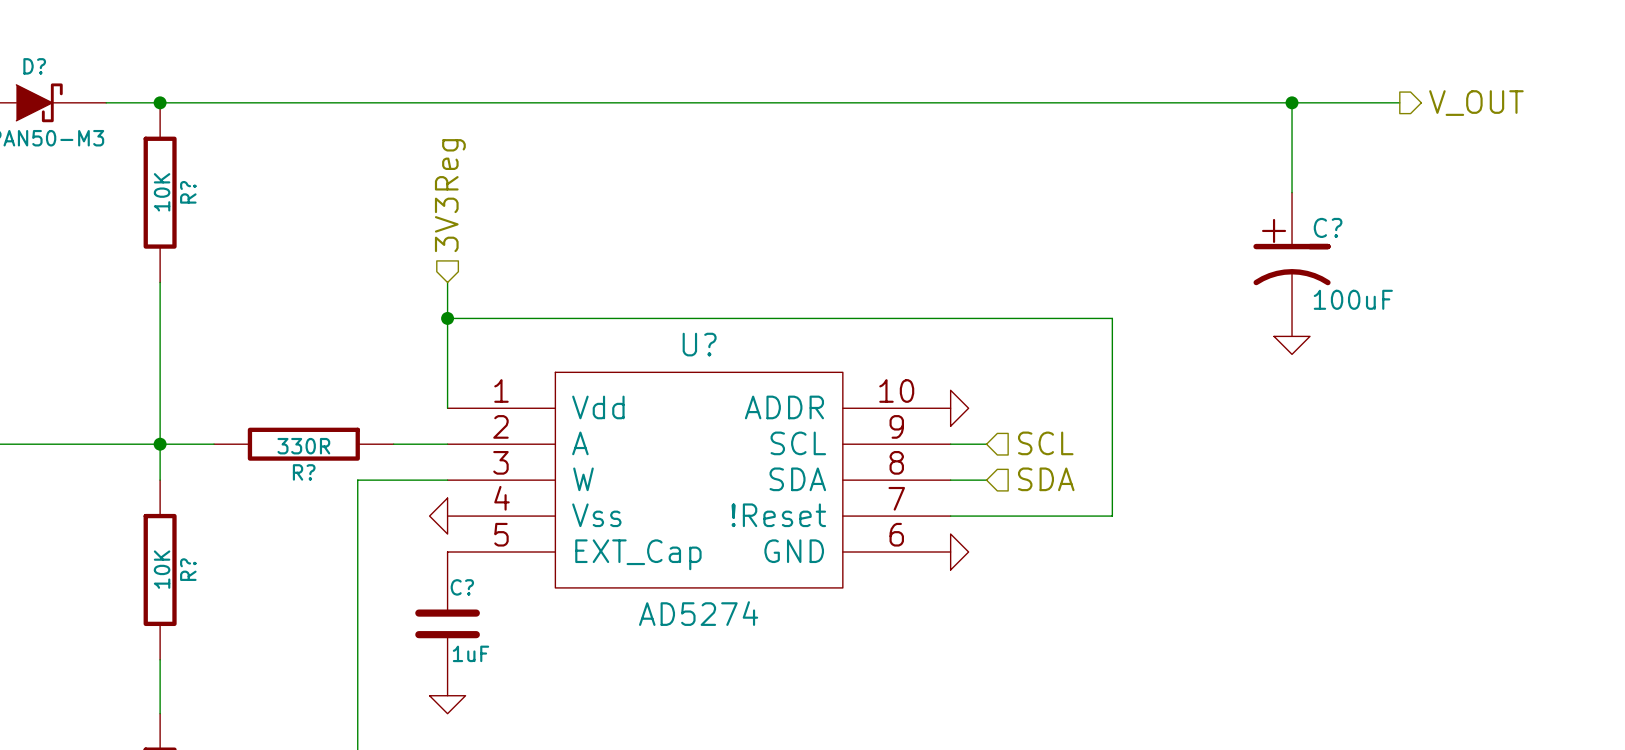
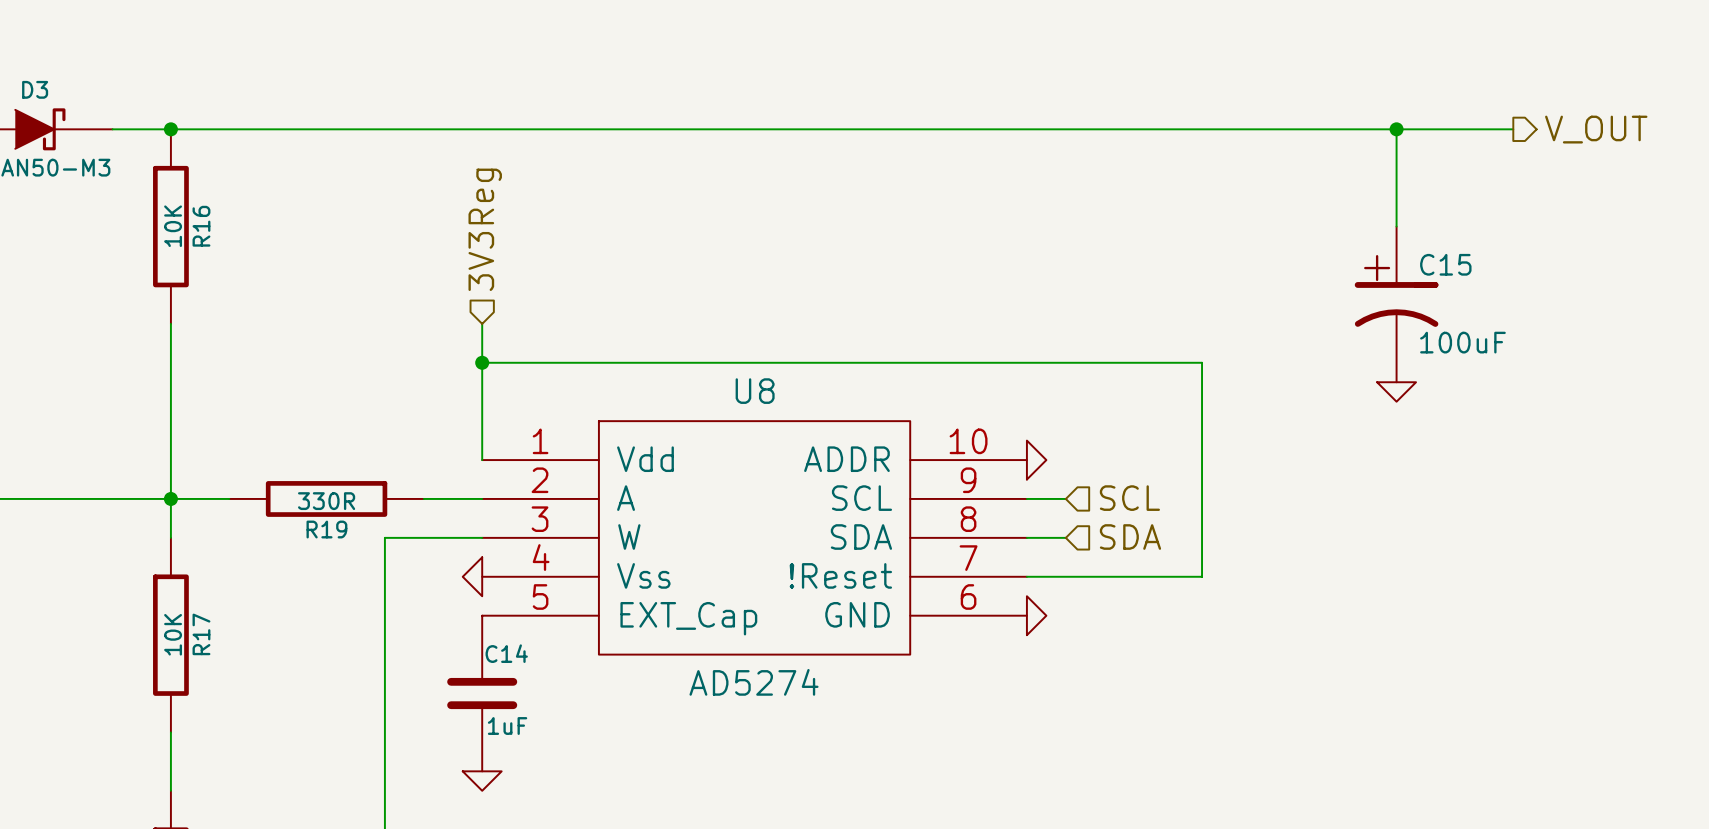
D? name: D? (34, 66) -> D3 (35, 89)
R? name: R? (188, 192) -> R16 (201, 226)
C? name: C? (1328, 227) -> C15 (1445, 264)
U? name: U? (699, 344) -> U8 (755, 391)
R? name: R? (304, 472) -> R19 (326, 529)
R? name: R? (188, 569) -> R17 (201, 634)
C? name: C? (462, 587) -> C14 (506, 653)

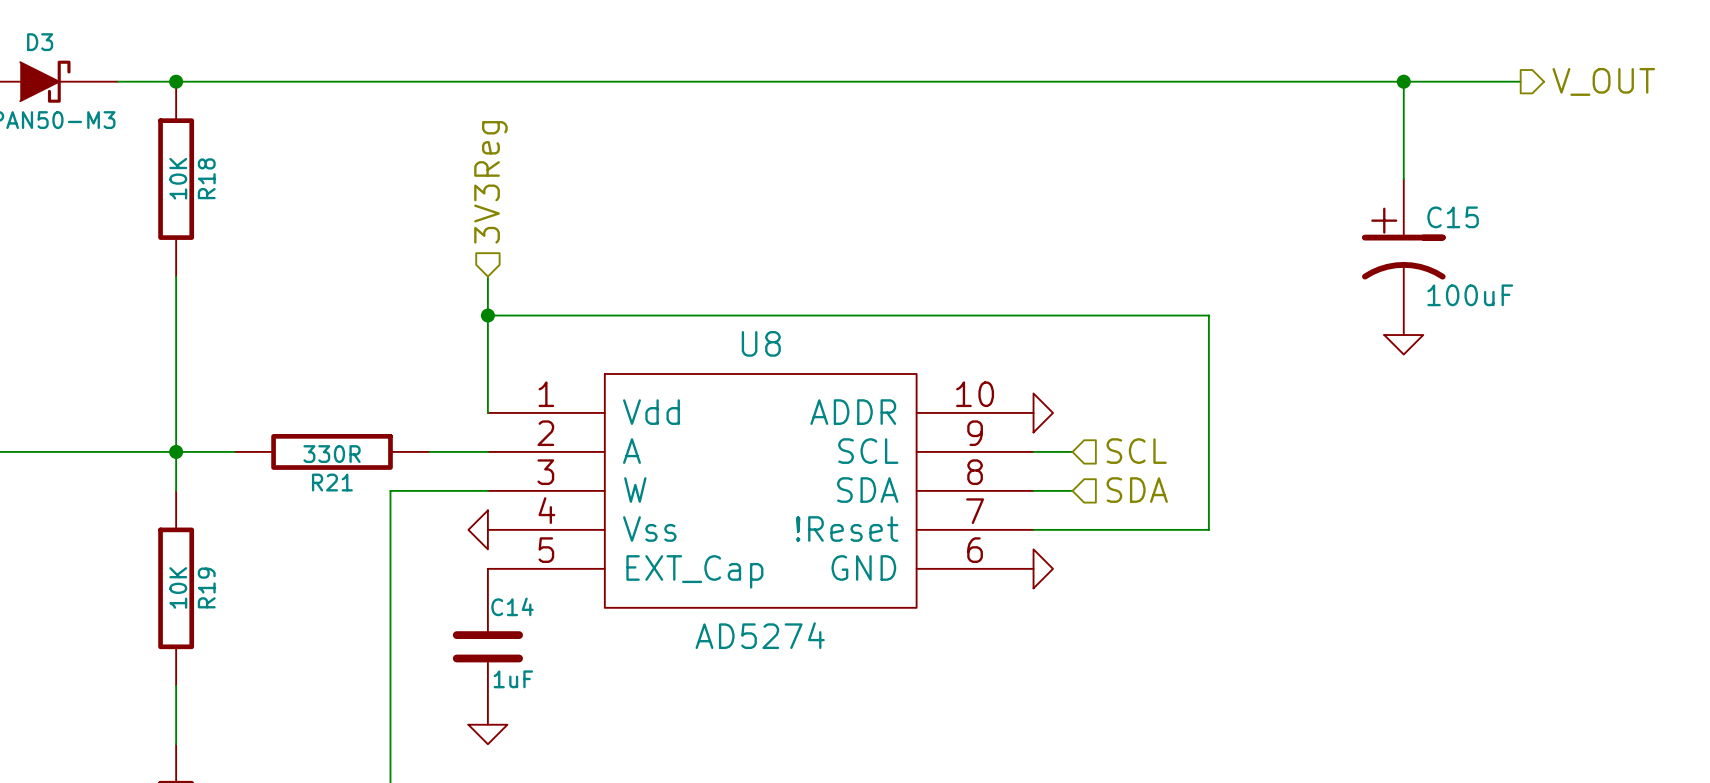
R16 name: R16 (201, 226) -> R18 (206, 178)
R19 name: R19 (326, 529) -> R21 (332, 482)
R17 name: R17 (201, 634) -> R19 (206, 587)

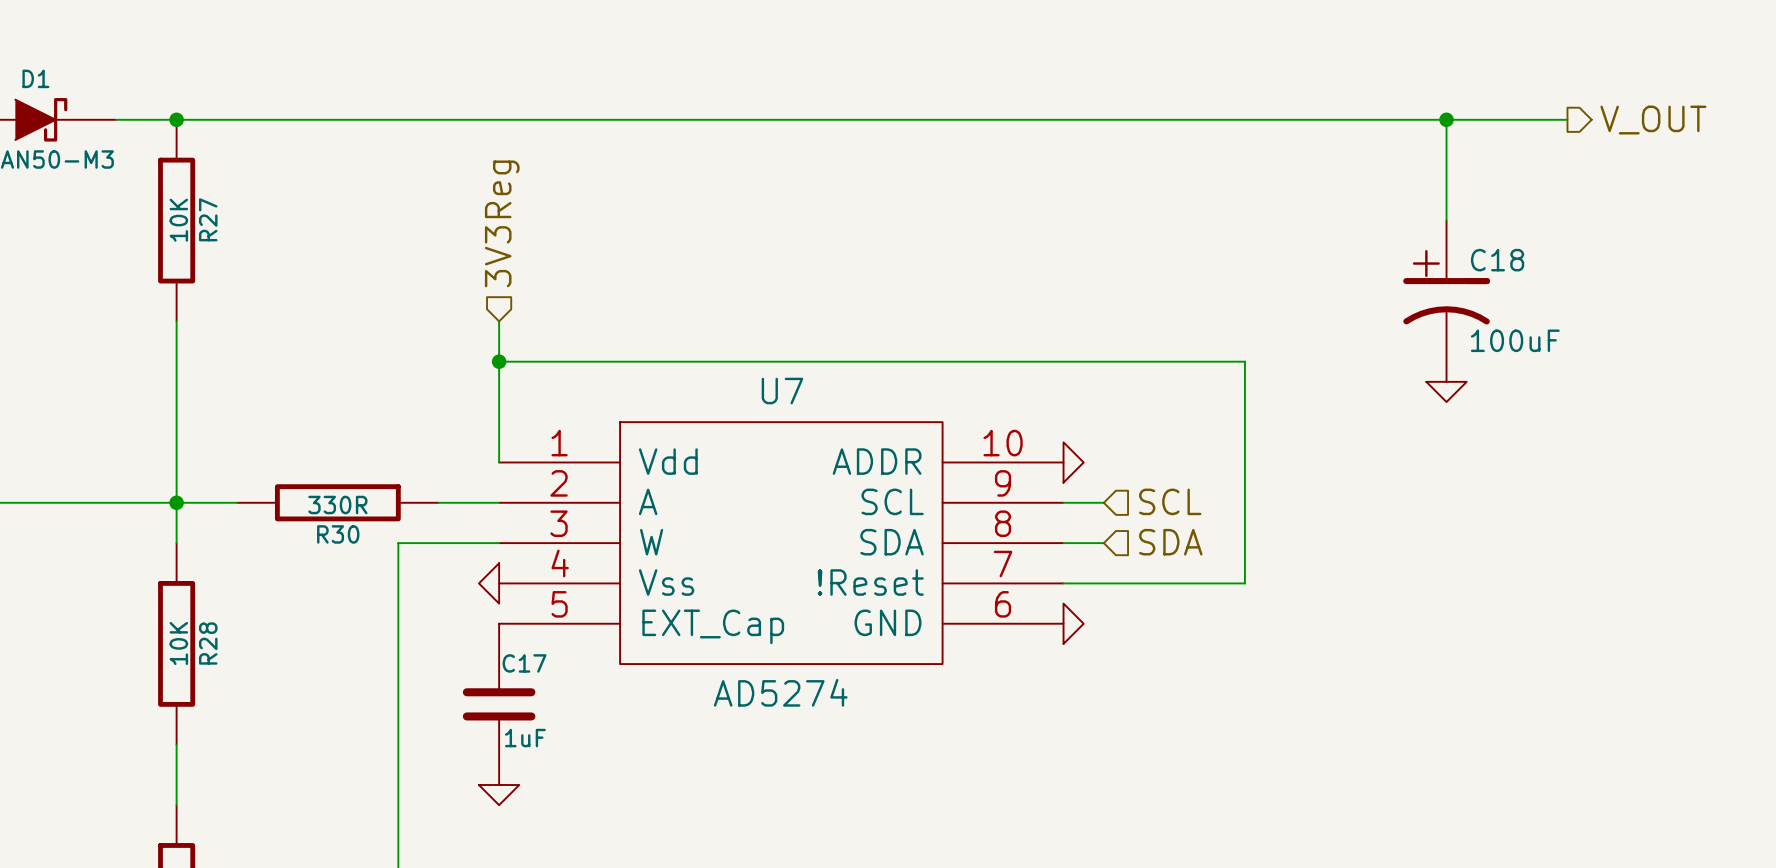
D3 name: D3 (40, 42) -> D1 (35, 78)
R18 name: R18 (206, 178) -> R27 (208, 219)
C15 name: C15 (1453, 217) -> C18 (1497, 260)
U8 name: U8 (761, 343) -> U7 (782, 391)
R21 name: R21 (332, 482) -> R30 (338, 534)
R19 name: R19 (206, 587) -> R28 (208, 643)
C14 name: C14 (512, 606) -> C17 (524, 663)

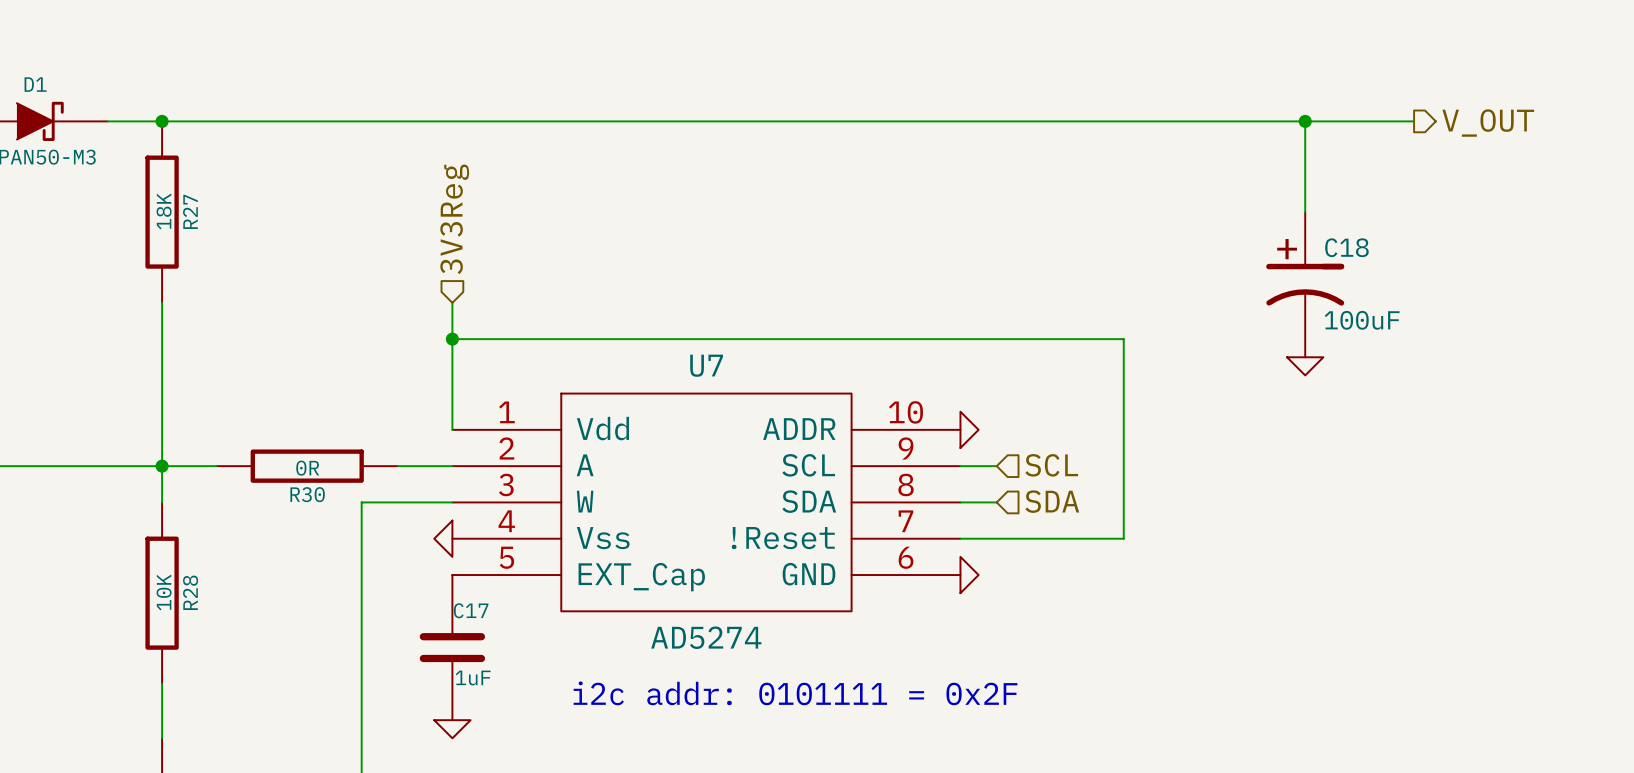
R27 value: 10K (178, 220) -> 18K (164, 211)
R30 value: 330R (337, 505) -> 0R (307, 468)
text: none -> i2c addr: 0101111 = 0x2F (795, 693)

